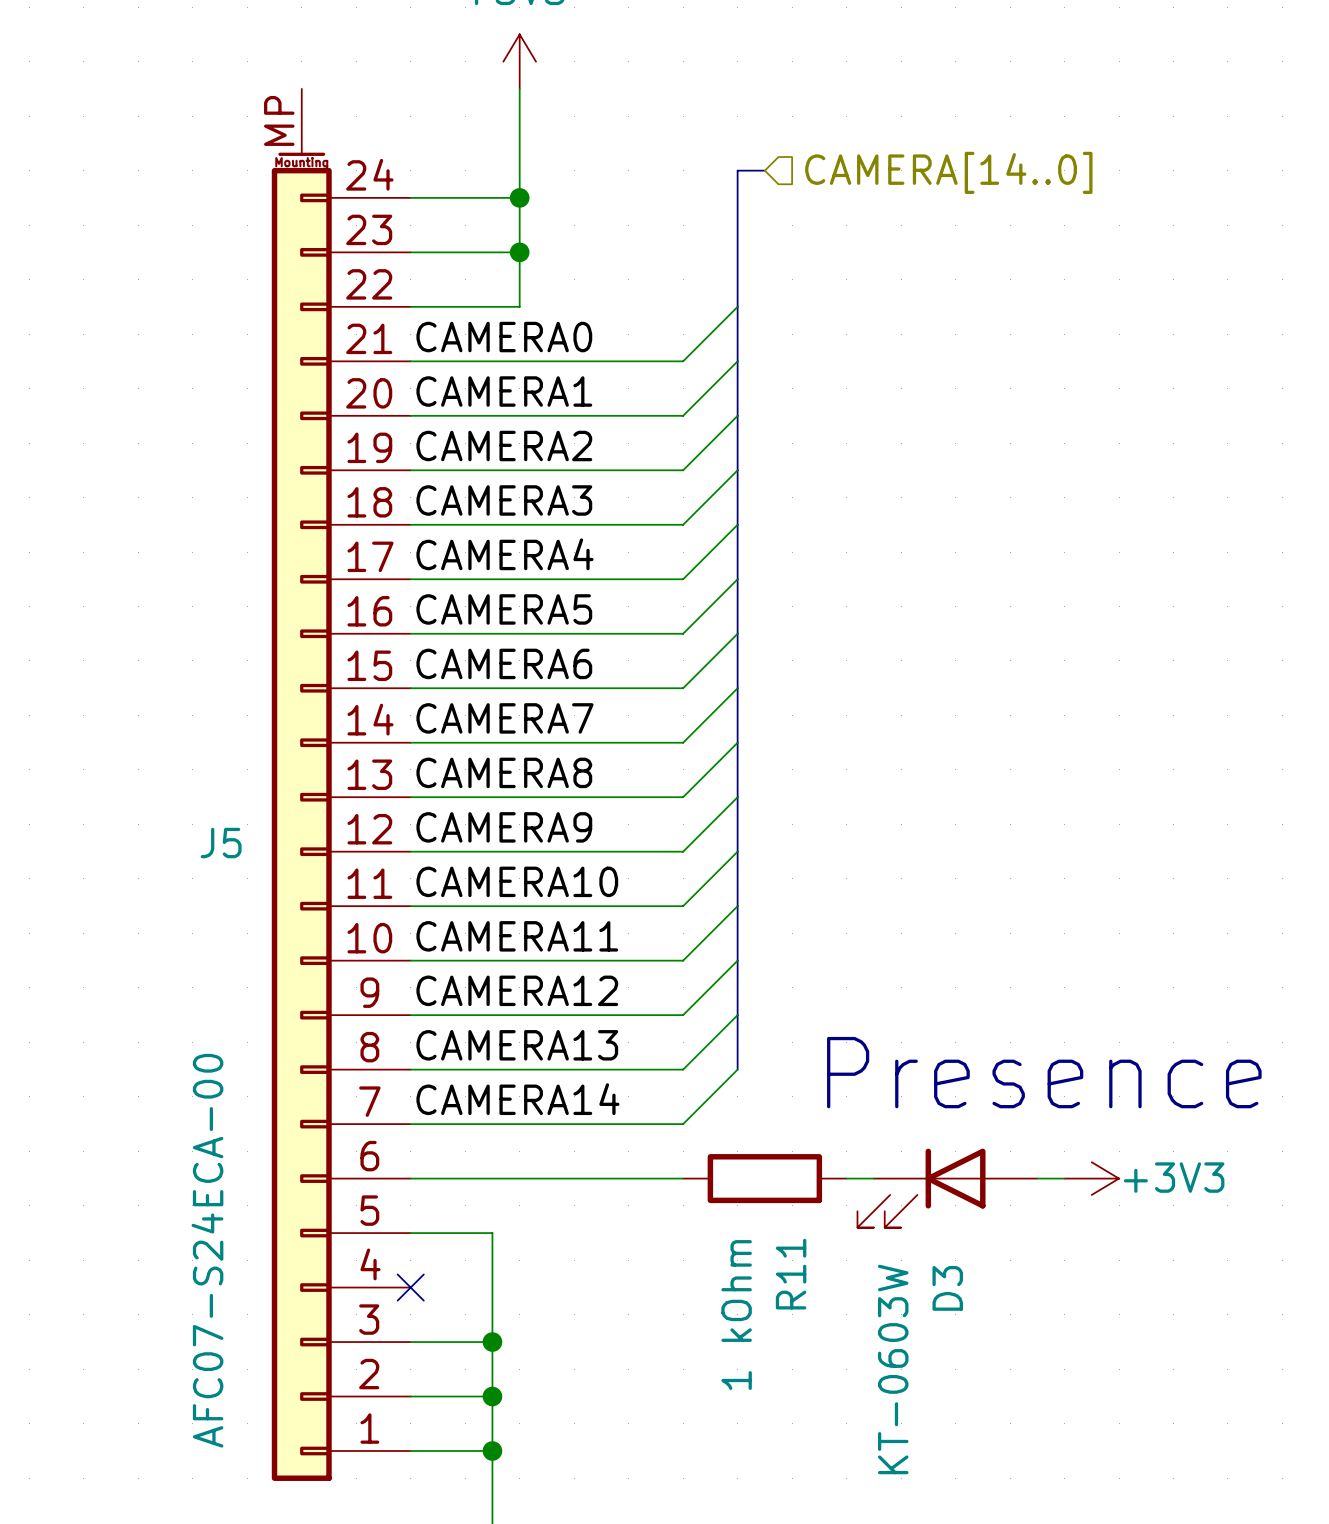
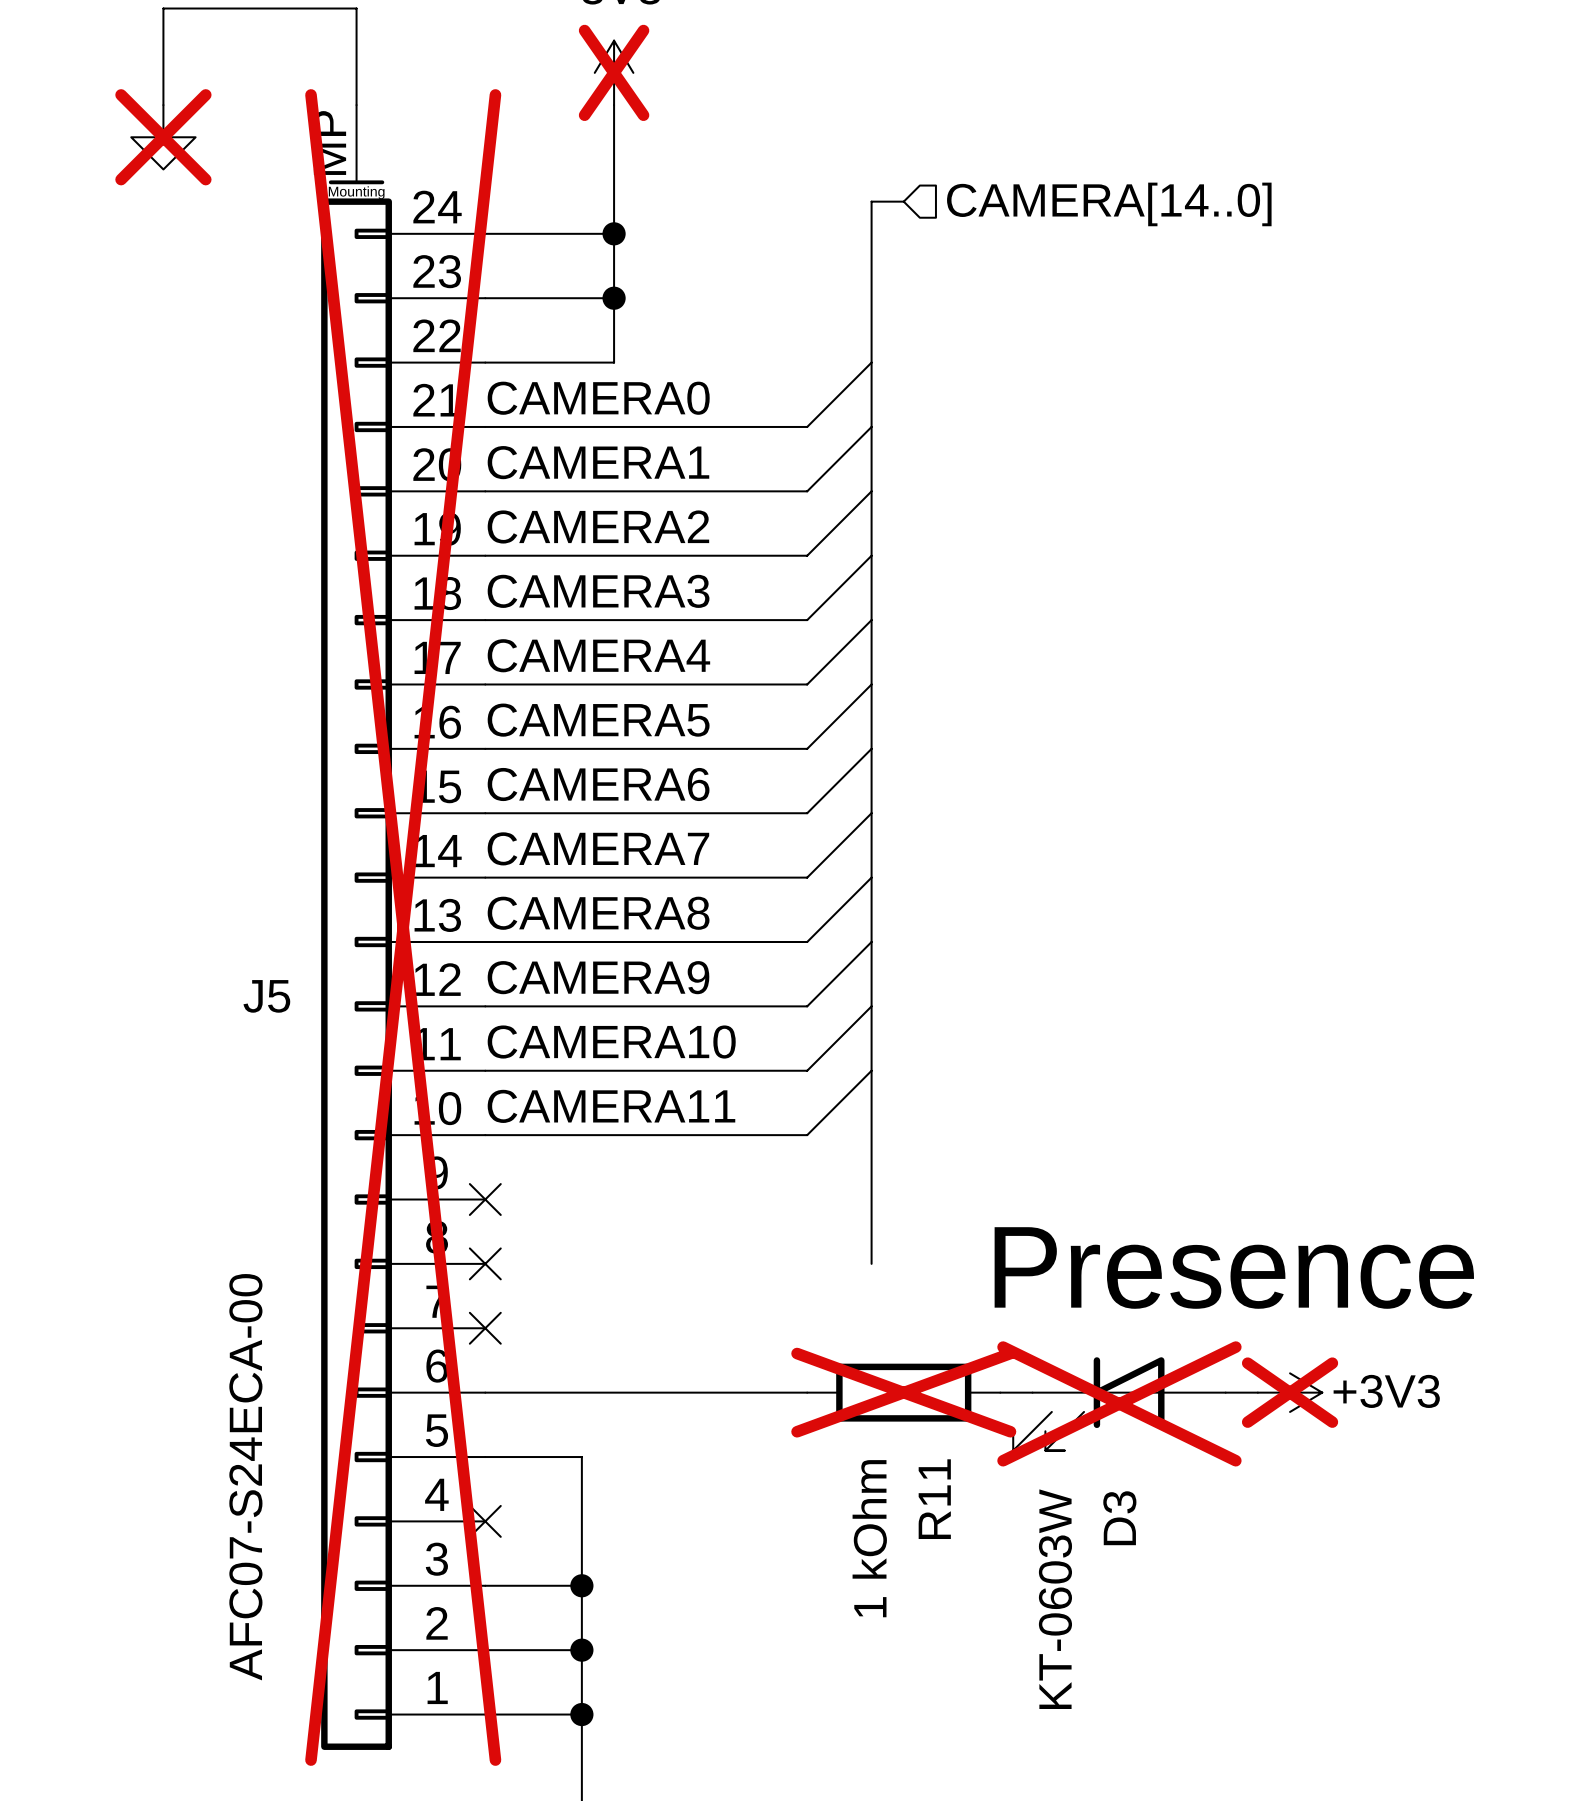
power symbol do-not-place cross: none -> (614, 72)
wire: none -> (163, 105) (163, 8) (356, 8) (356, 105)
power symbol: none -> (163, 137)
J5 do-not-place cross: none -> (403, 927)
wire: (737, 960) (683, 1015) (410, 1015) -> none
label: CAMERA12 (517, 990) -> none
no-connect mark: none -> (485, 1199)
wire: (737, 1015) (683, 1069) (410, 1069) -> none
label: CAMERA13 (517, 1045) -> none
no-connect mark: none -> (485, 1263)
wire: (737, 1069) (683, 1124) (410, 1124) -> none
label: CAMERA14 (517, 1099) -> none
no-connect mark: none -> (485, 1328)
R11 do-not-place cross: none -> (903, 1392)
power symbol do-not-place cross: none -> (1290, 1392)
D3 do-not-place cross: none -> (1119, 1403)

